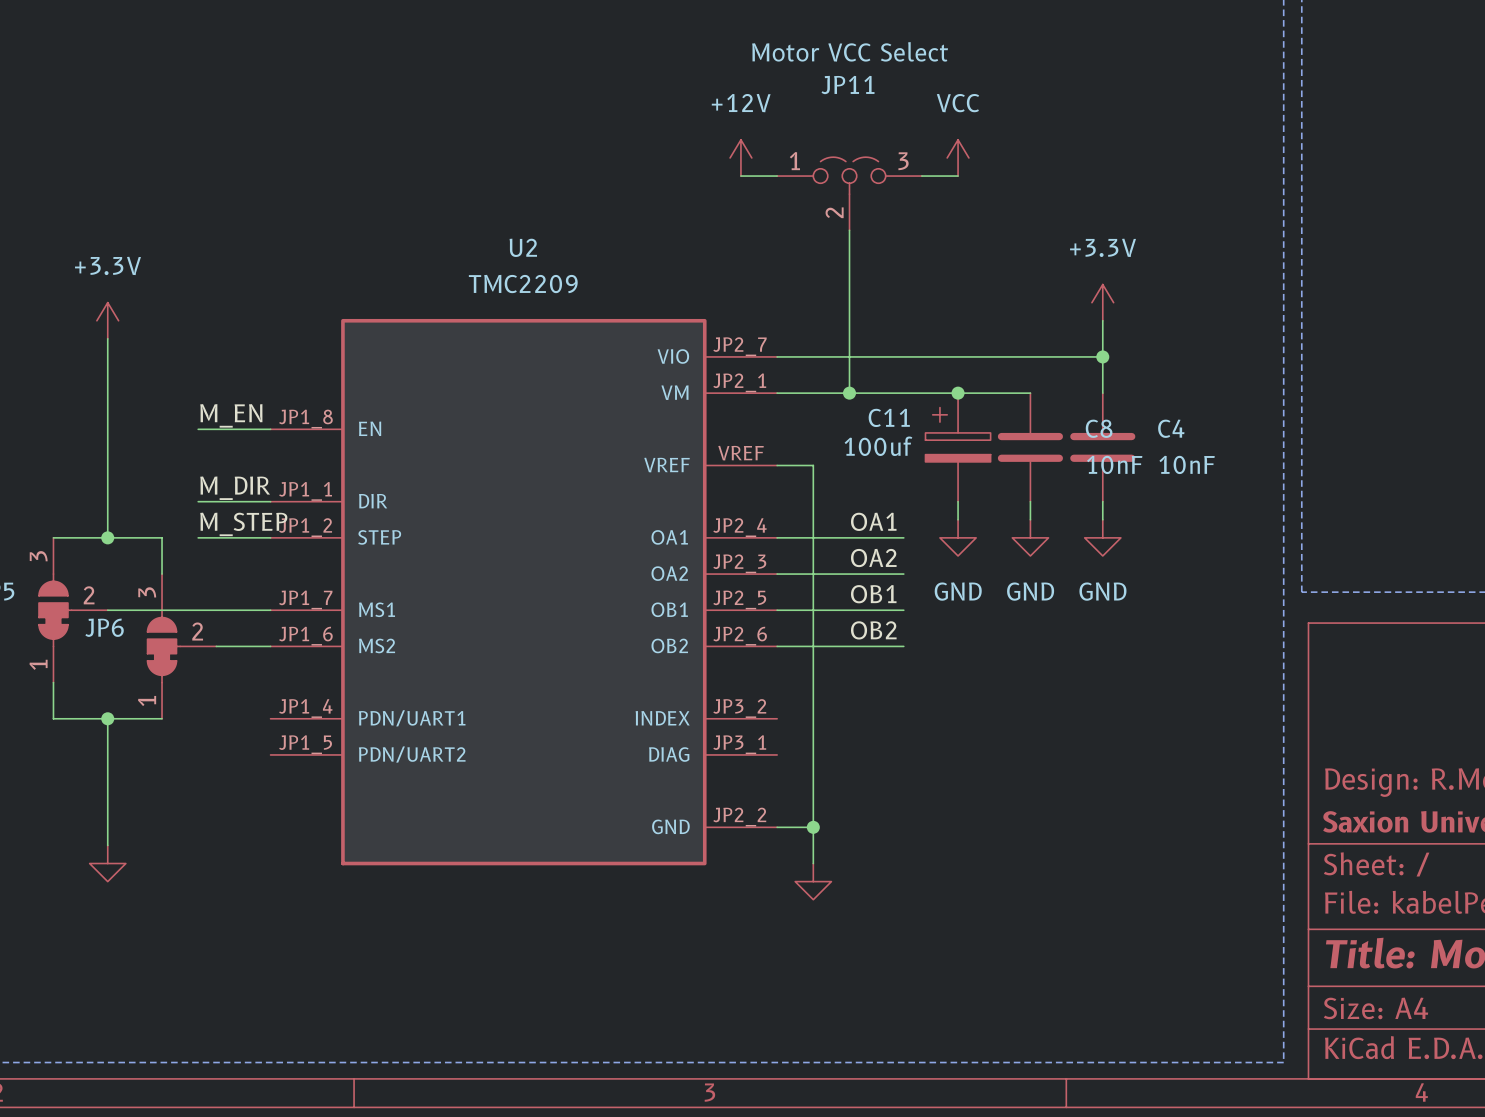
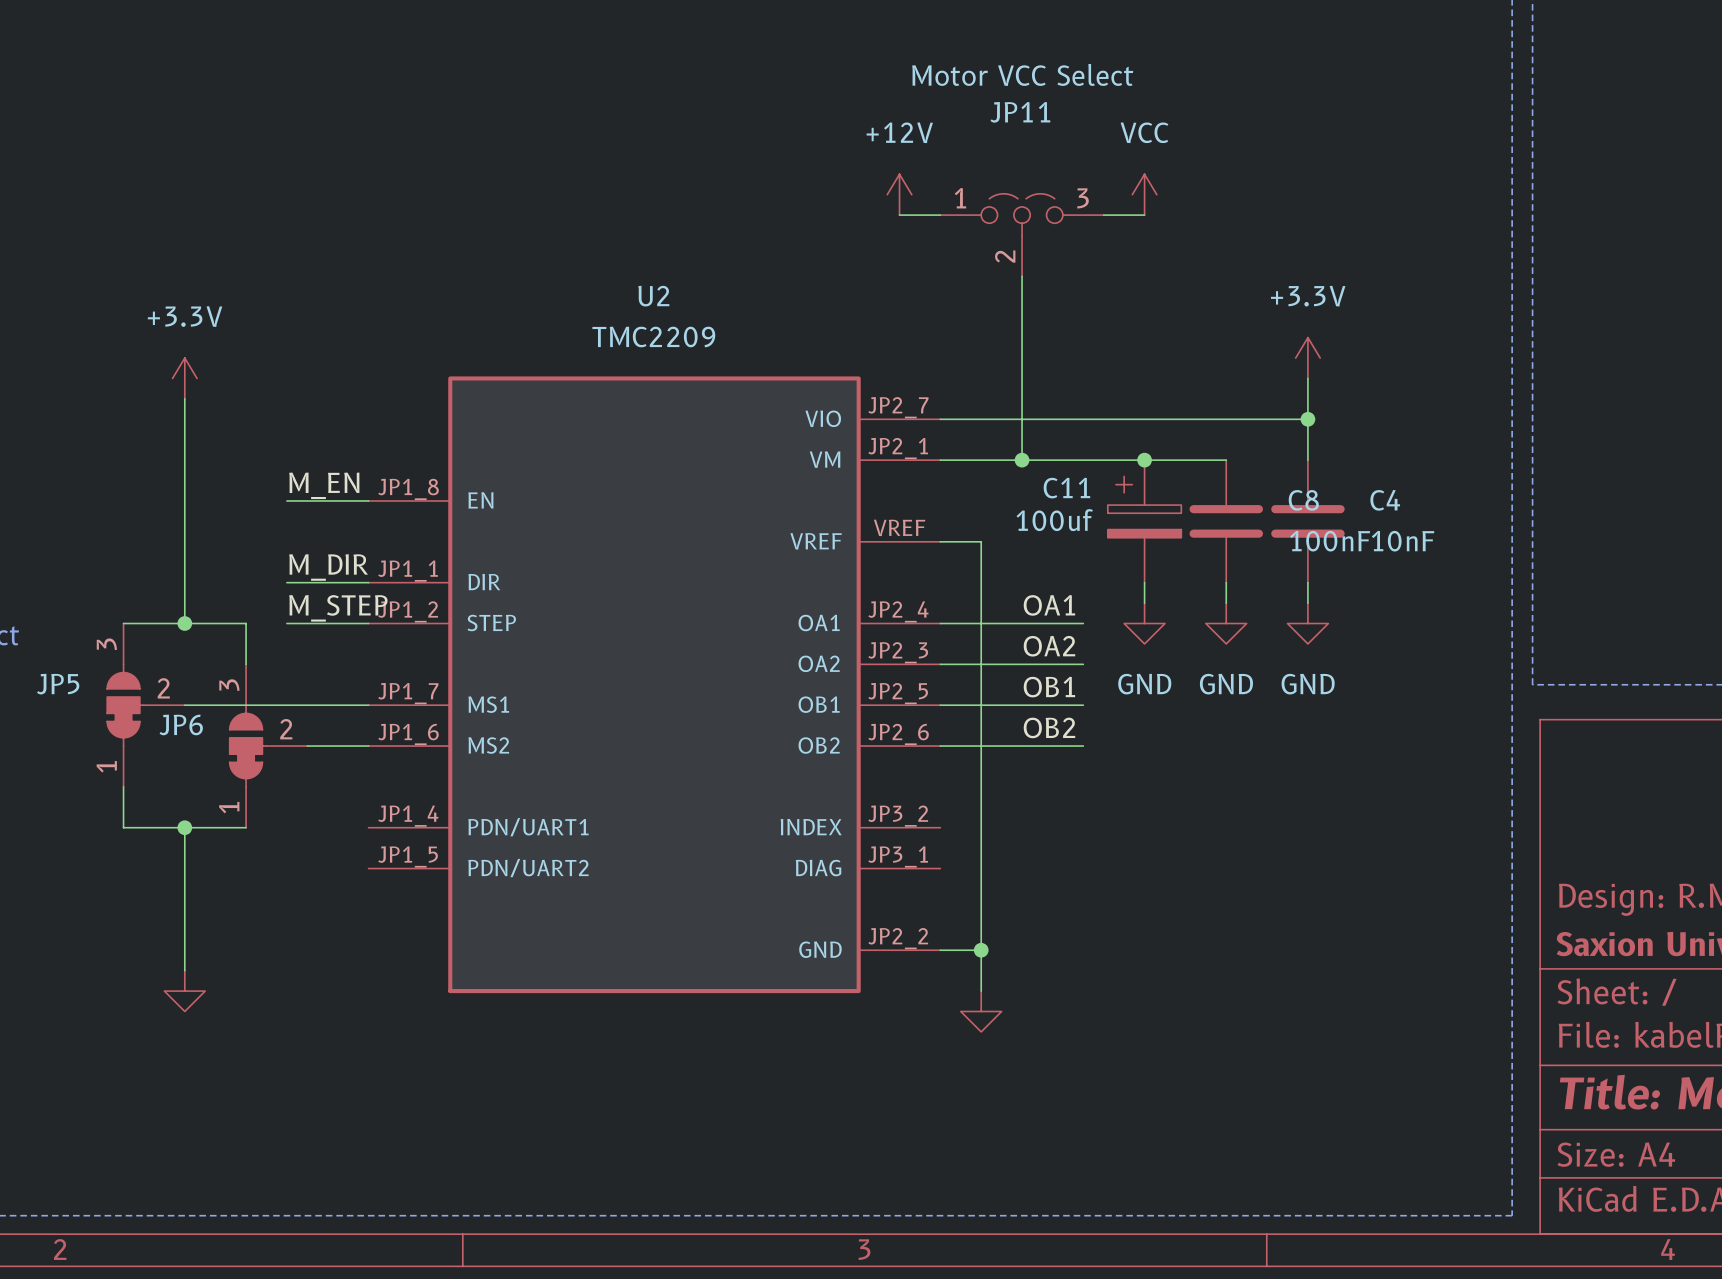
C8 value: 10nF (1114, 464) -> 100nF (1330, 541)

